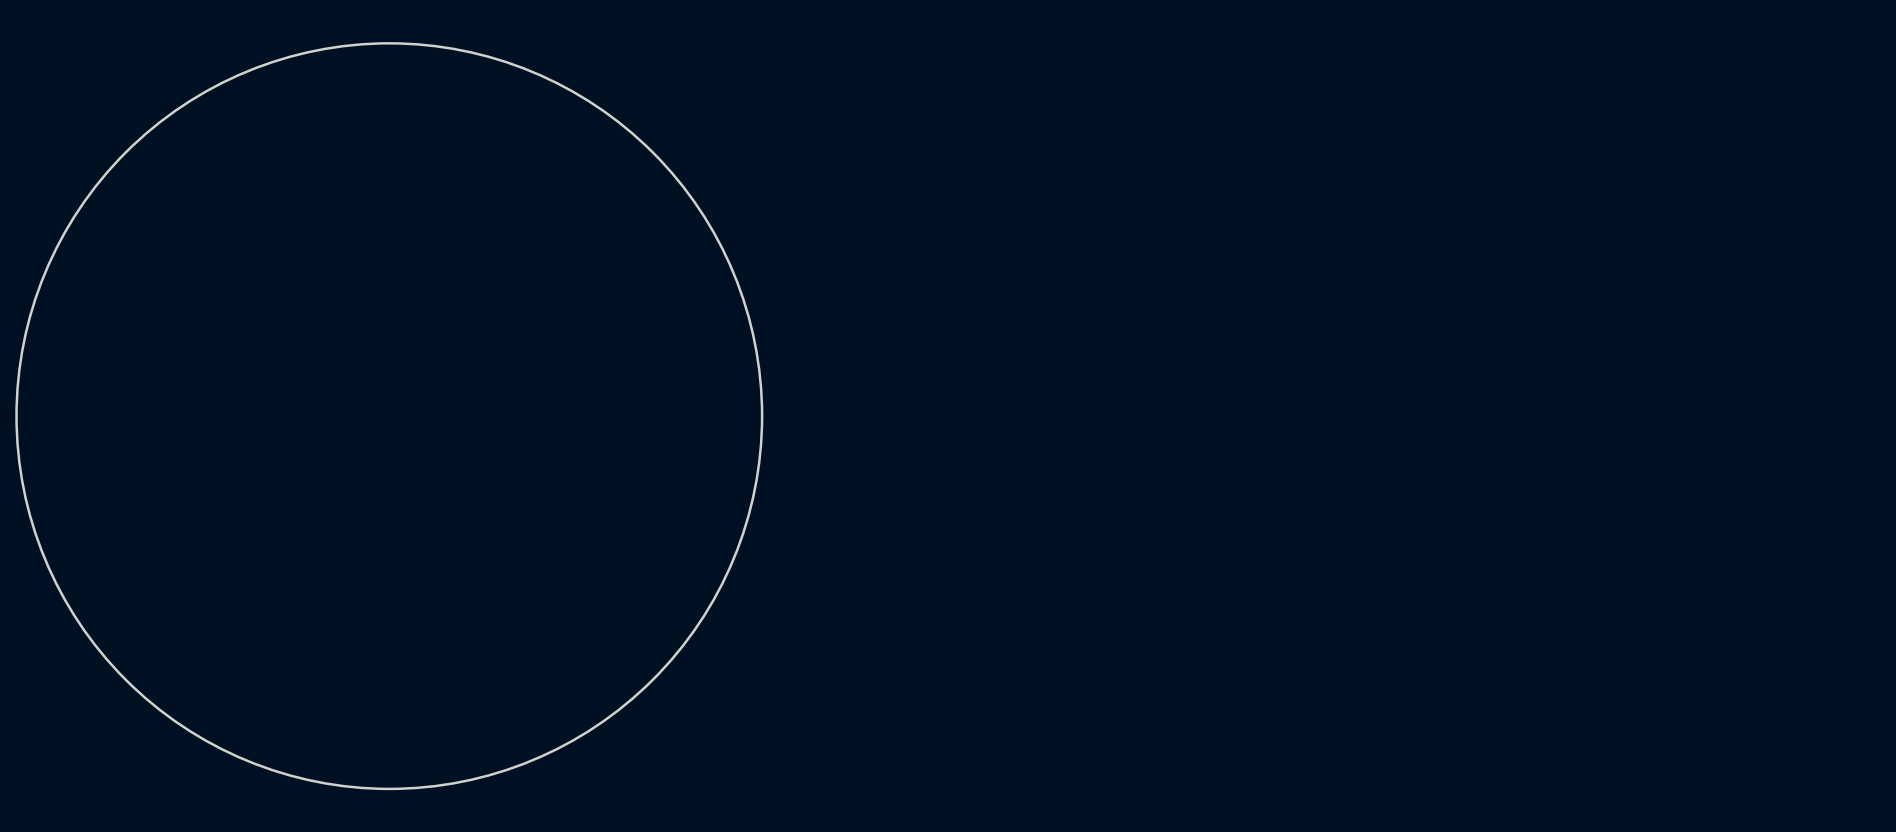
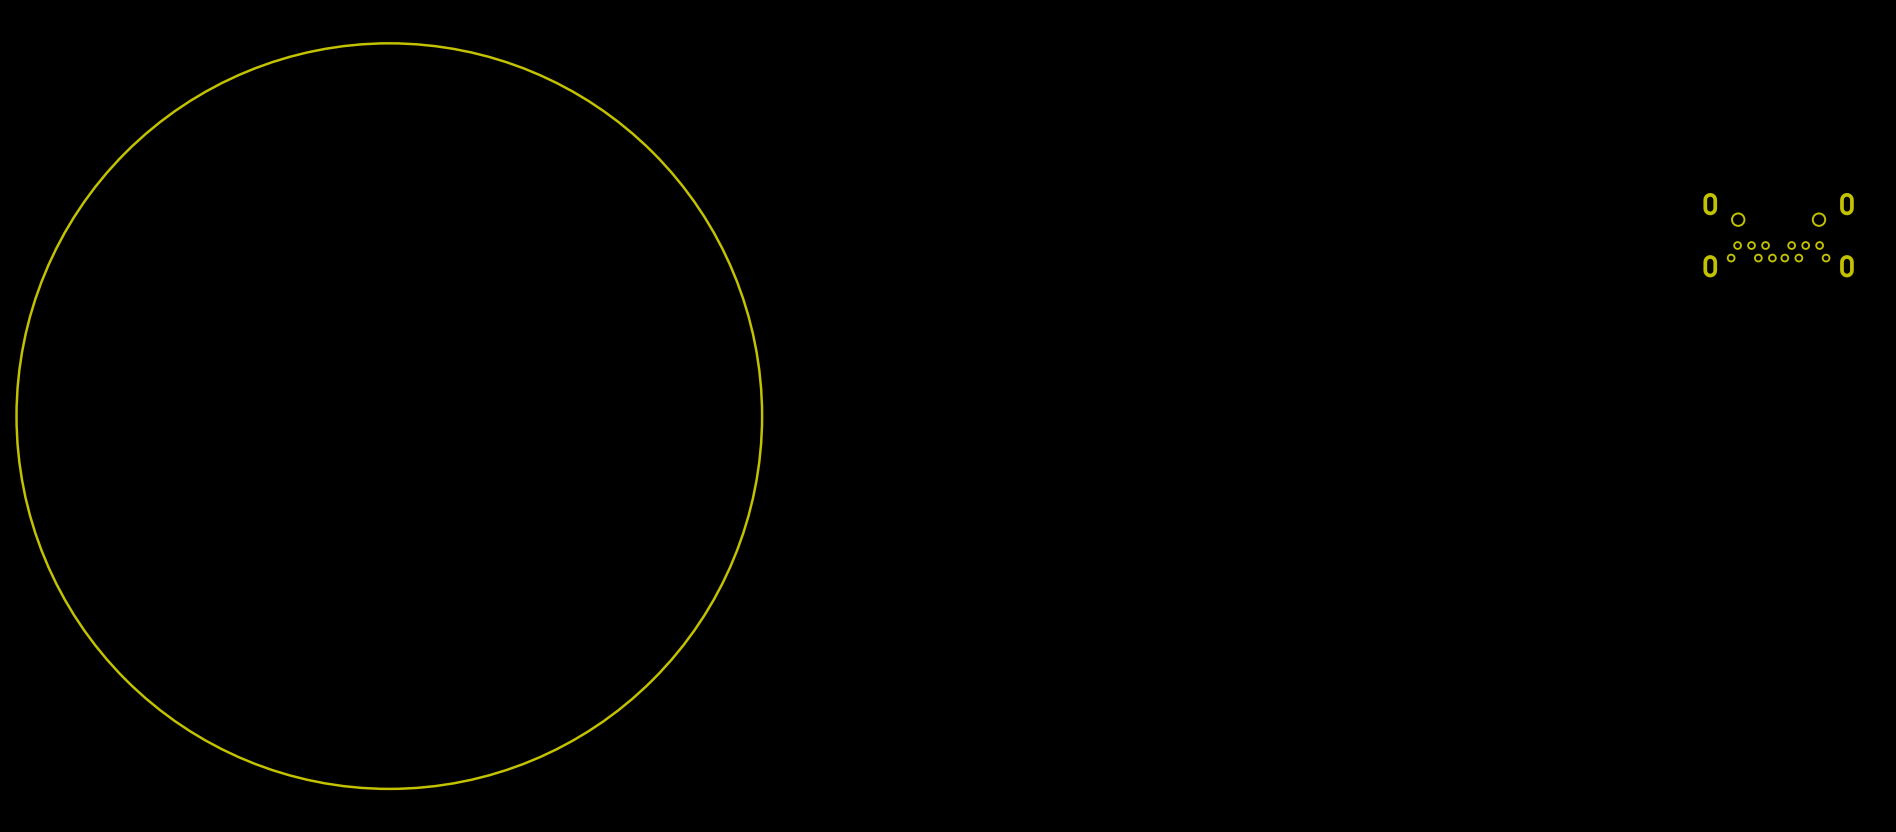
part: none -> (1778, 235)

